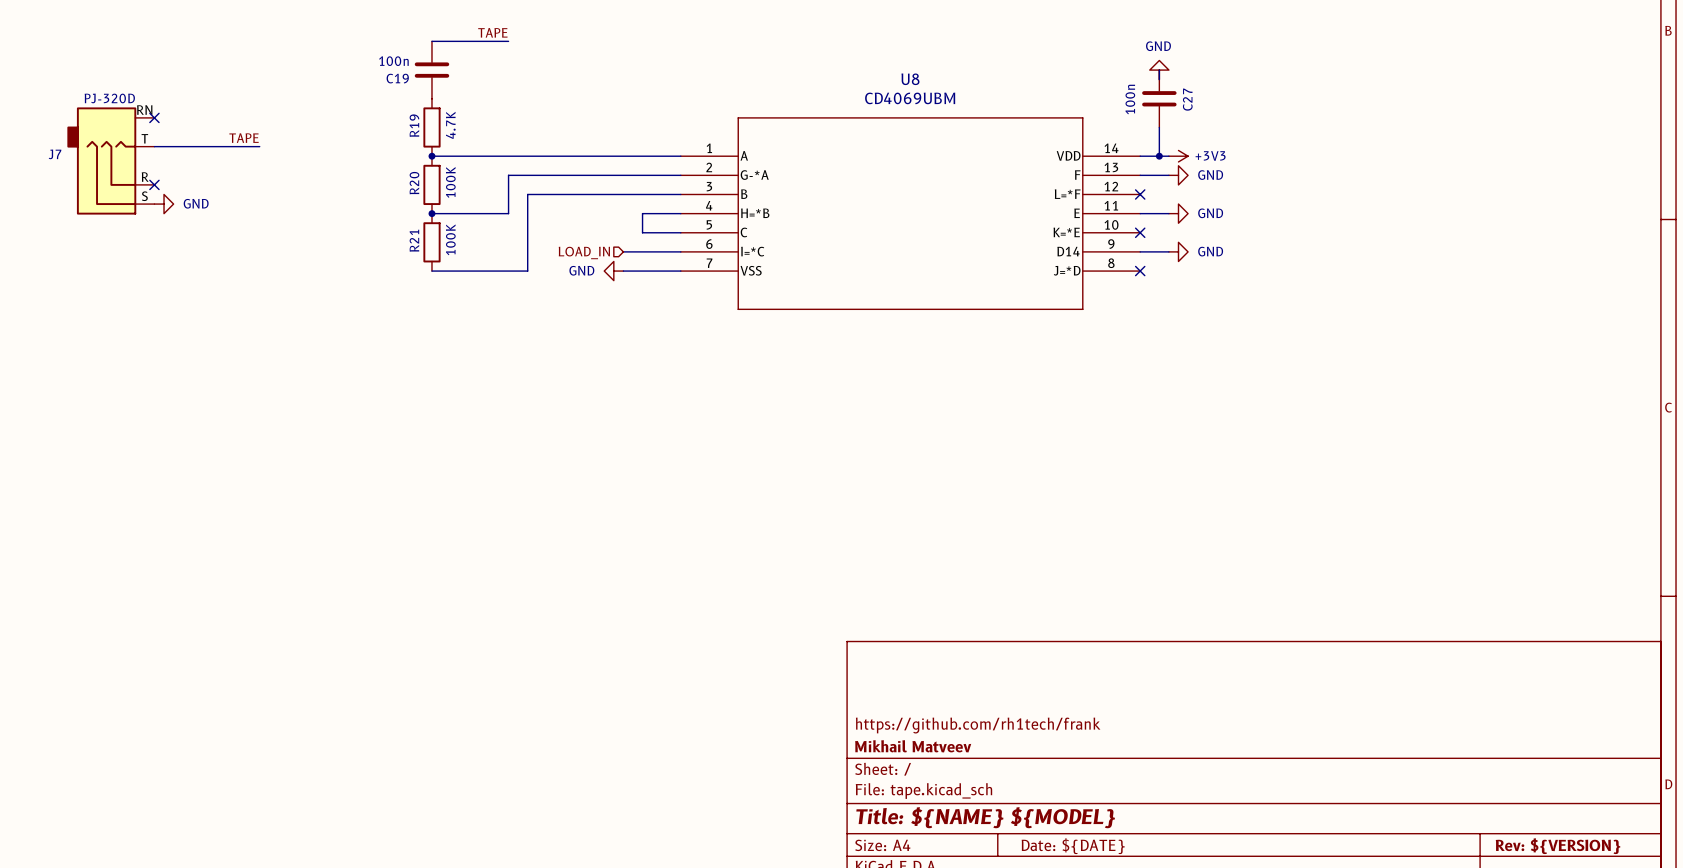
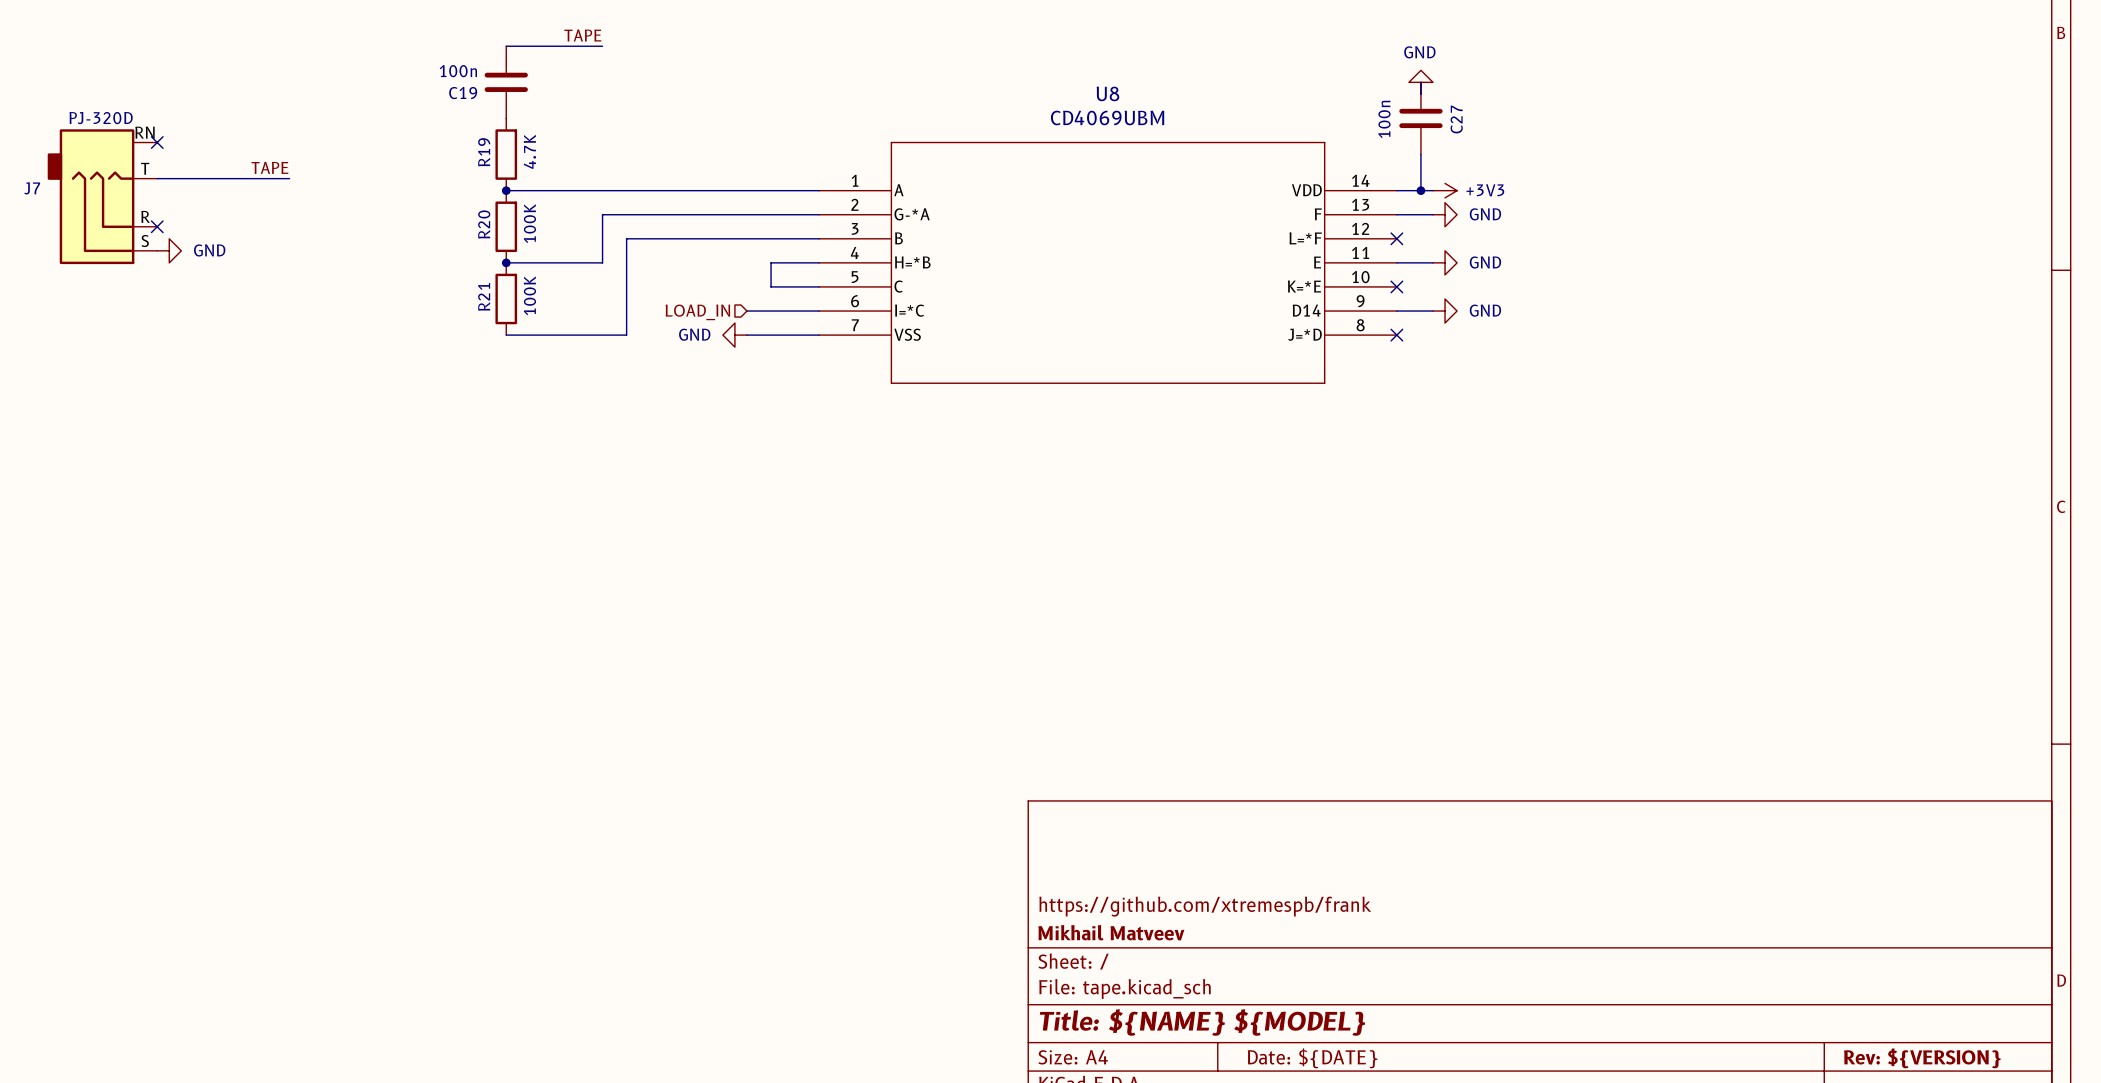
title block: https://github.com/rh1tech/frank (978, 725) -> https://github.com/xtremespb/frank (1205, 906)

